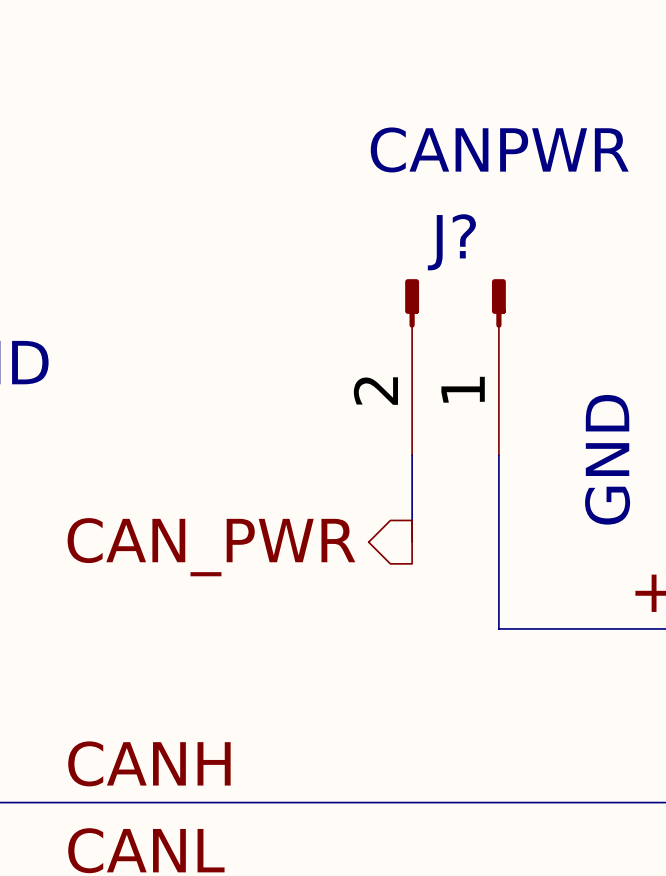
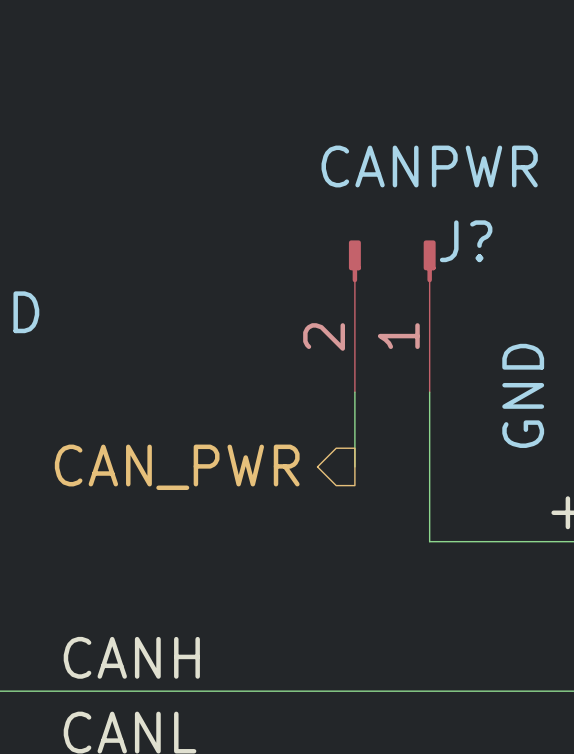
J? value position: CANPWR (499, 149) -> CANPWR (429, 166)
J? name position: J? (451, 242) -> J? (466, 241)

